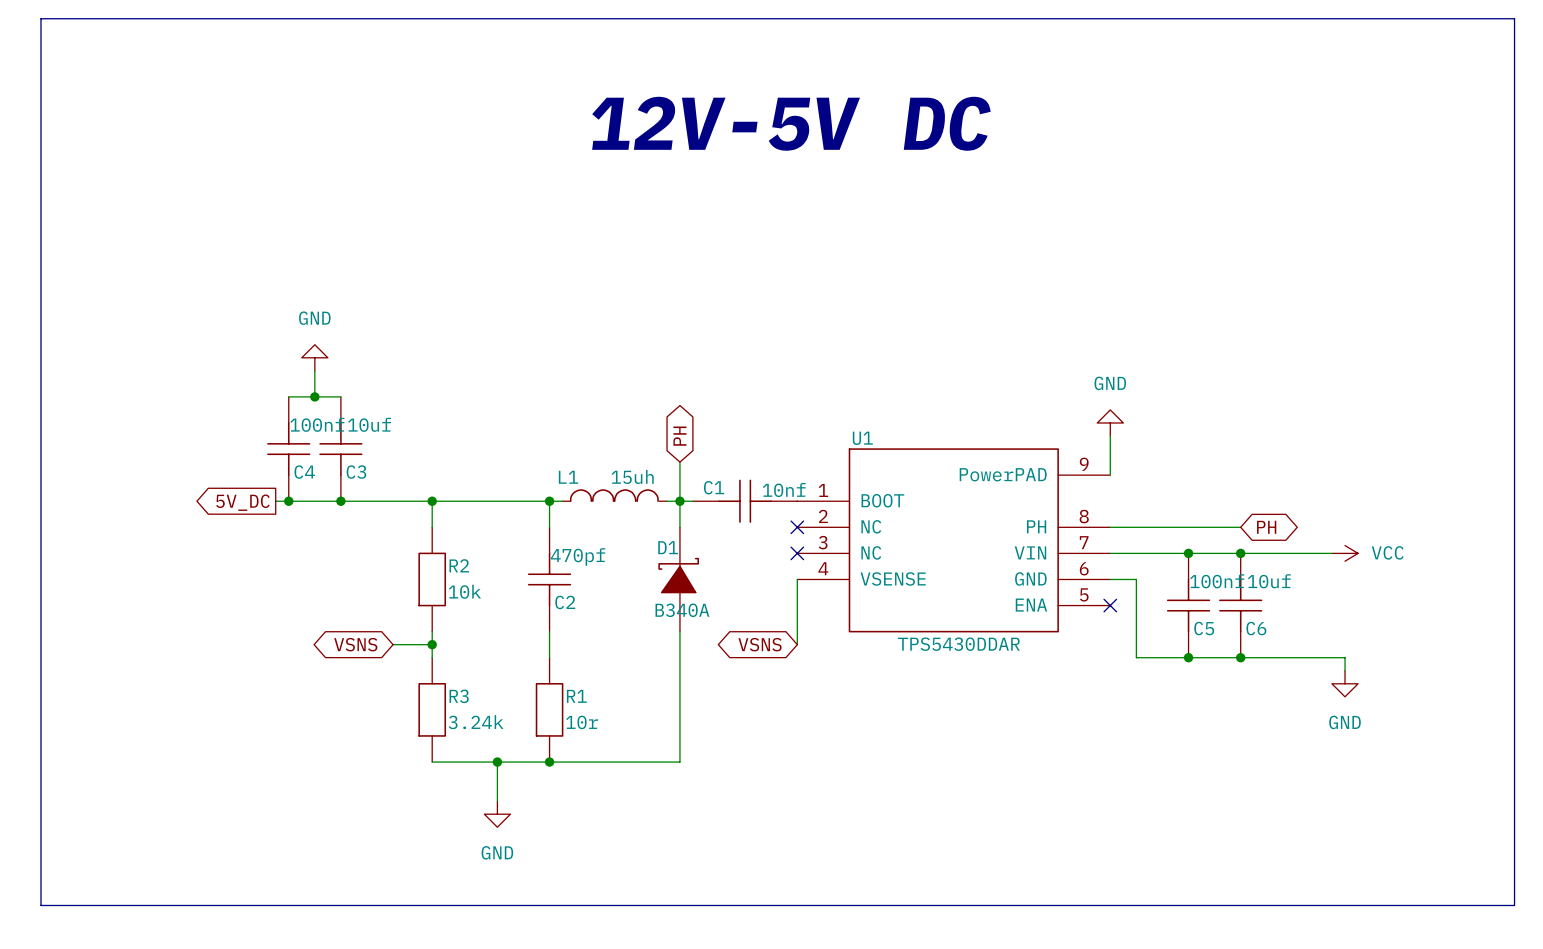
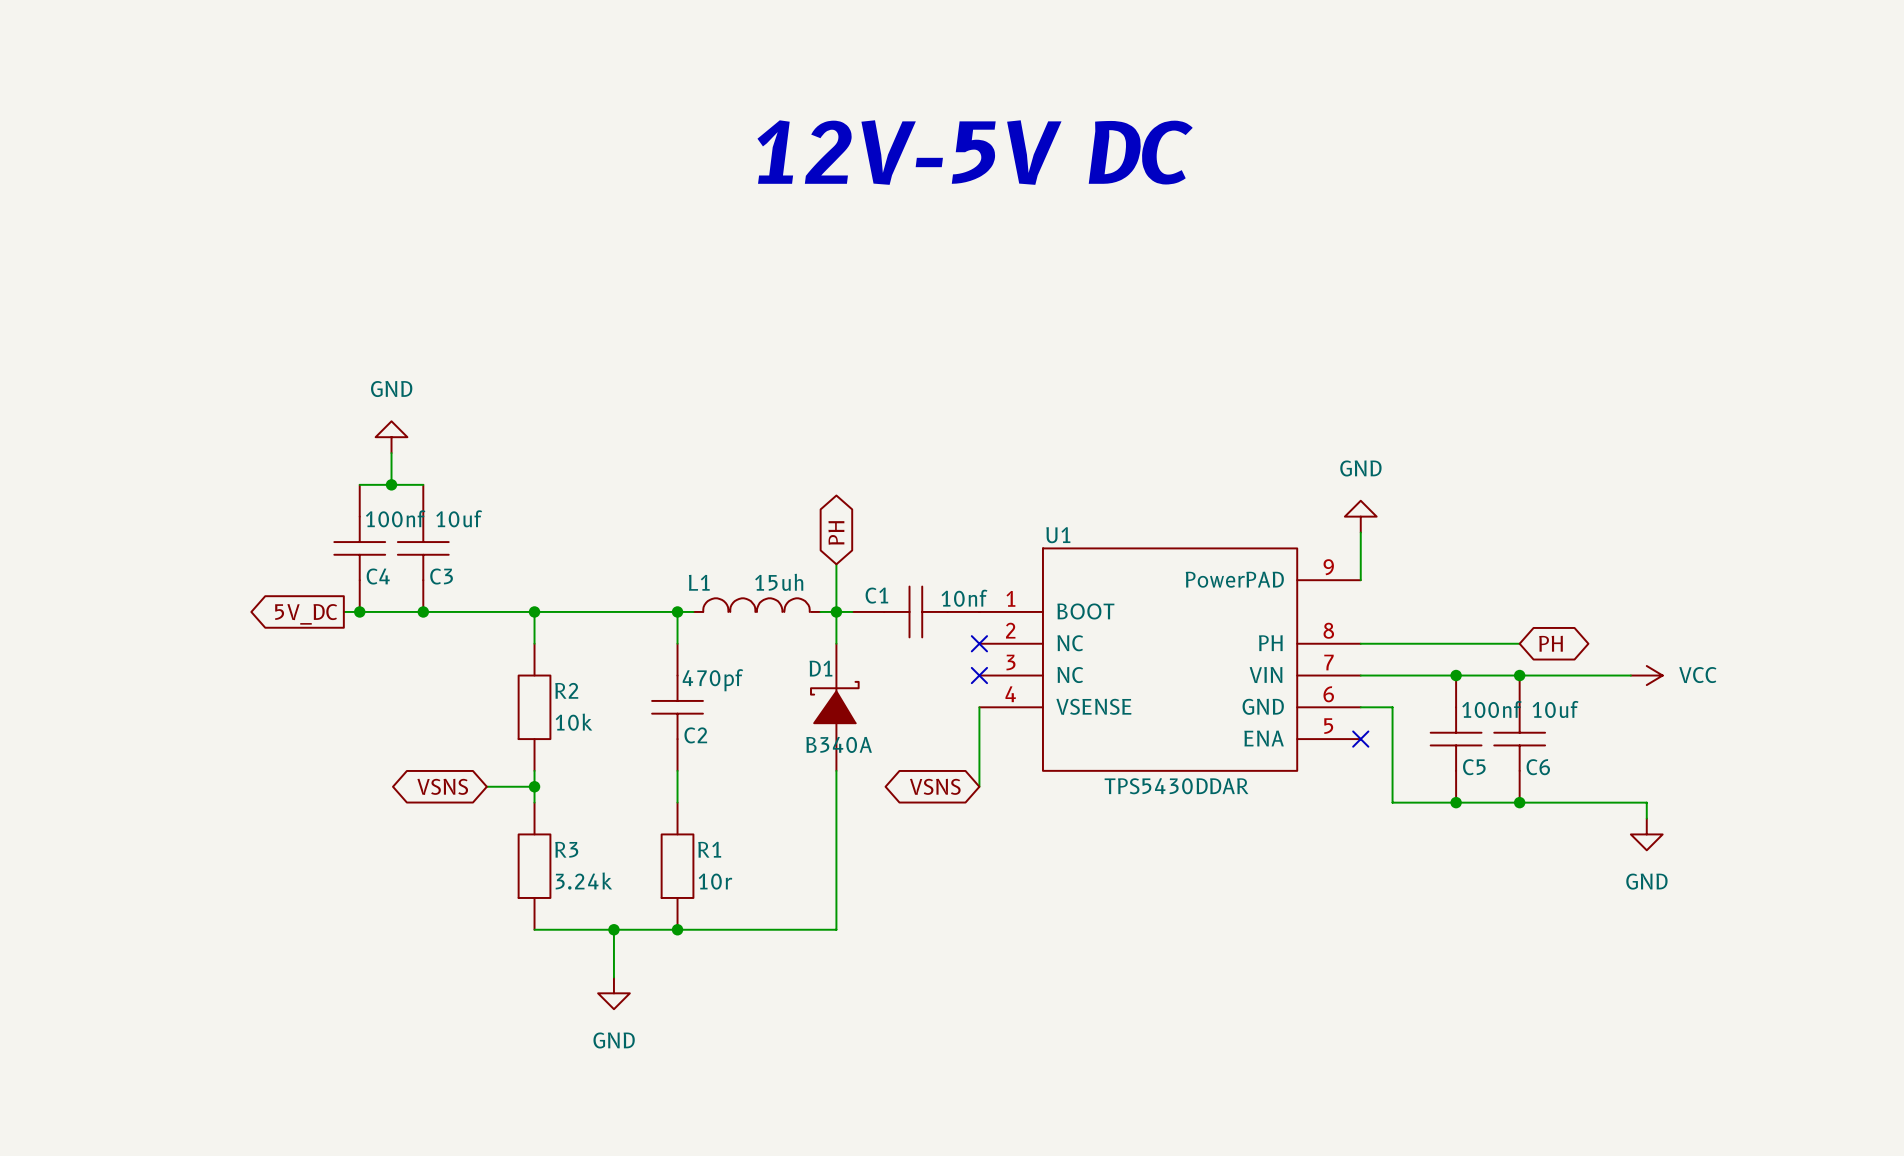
bus: (40, 18) (1514, 18) (1514, 905) (40, 905) (40, 18) -> none

